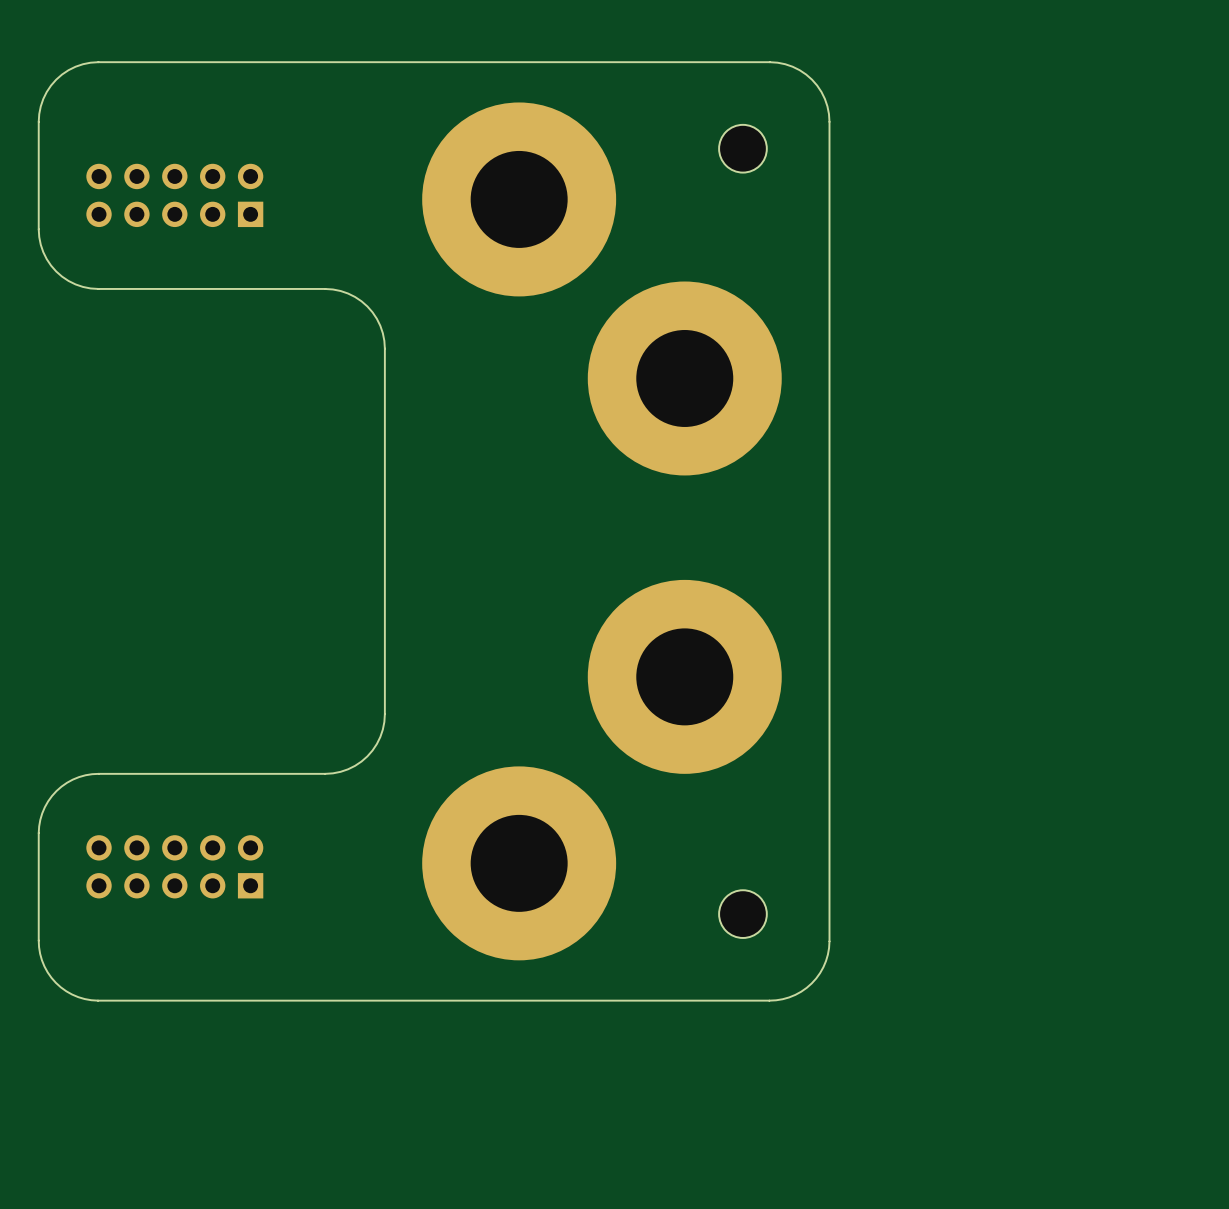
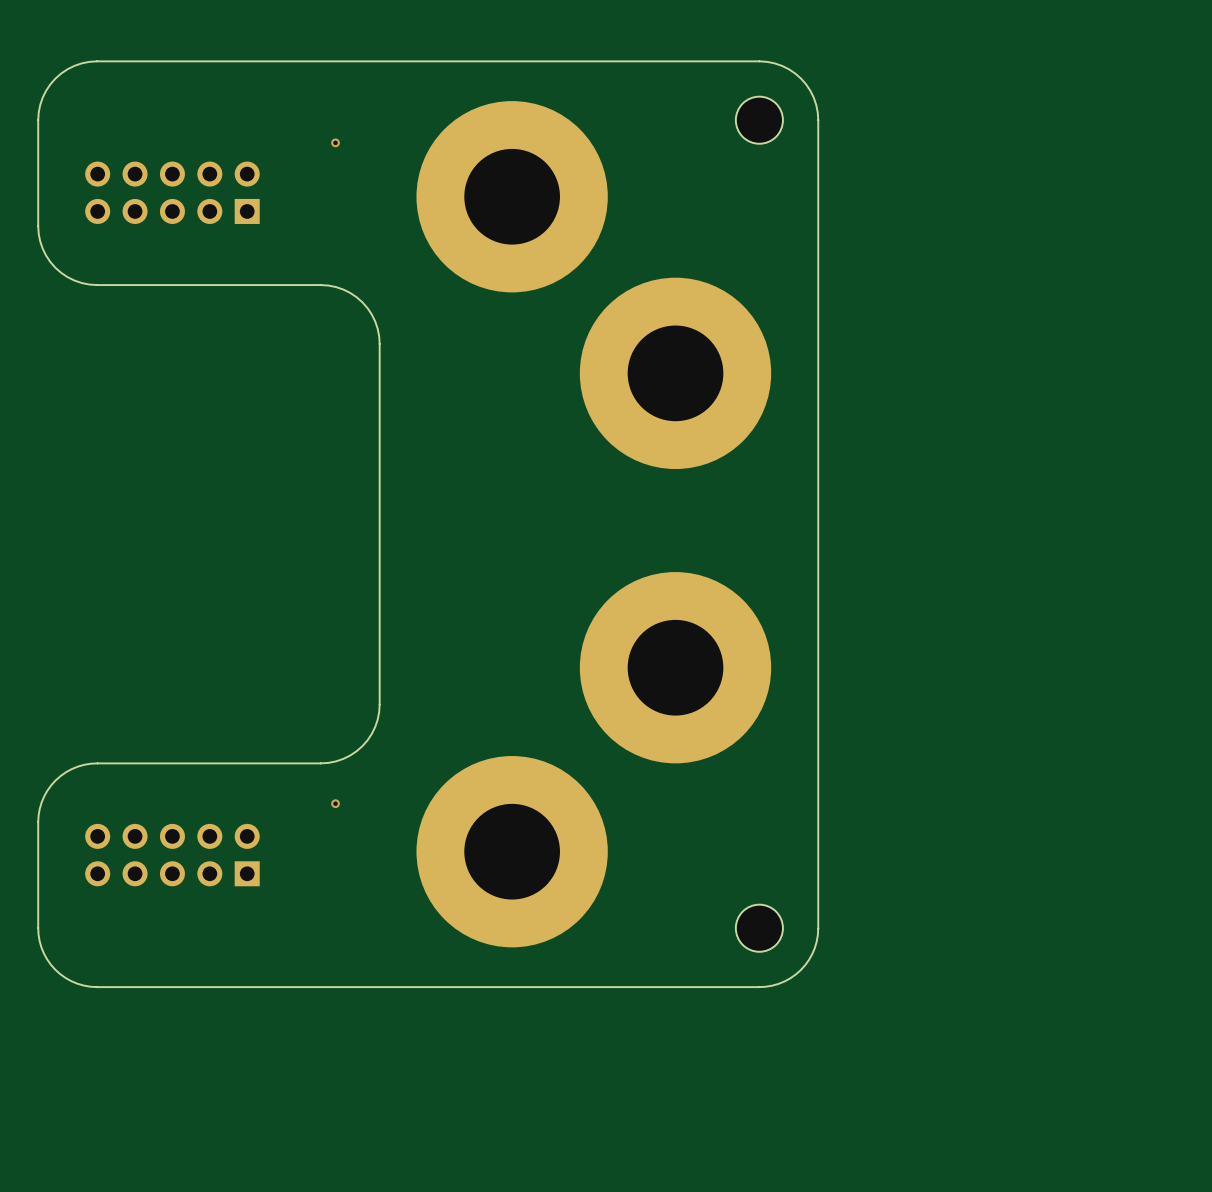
via: none -> (335, 142)
part position: (742, 148) -> (759, 120)
via: none -> (335, 803)
part position: (742, 914) -> (759, 928)

